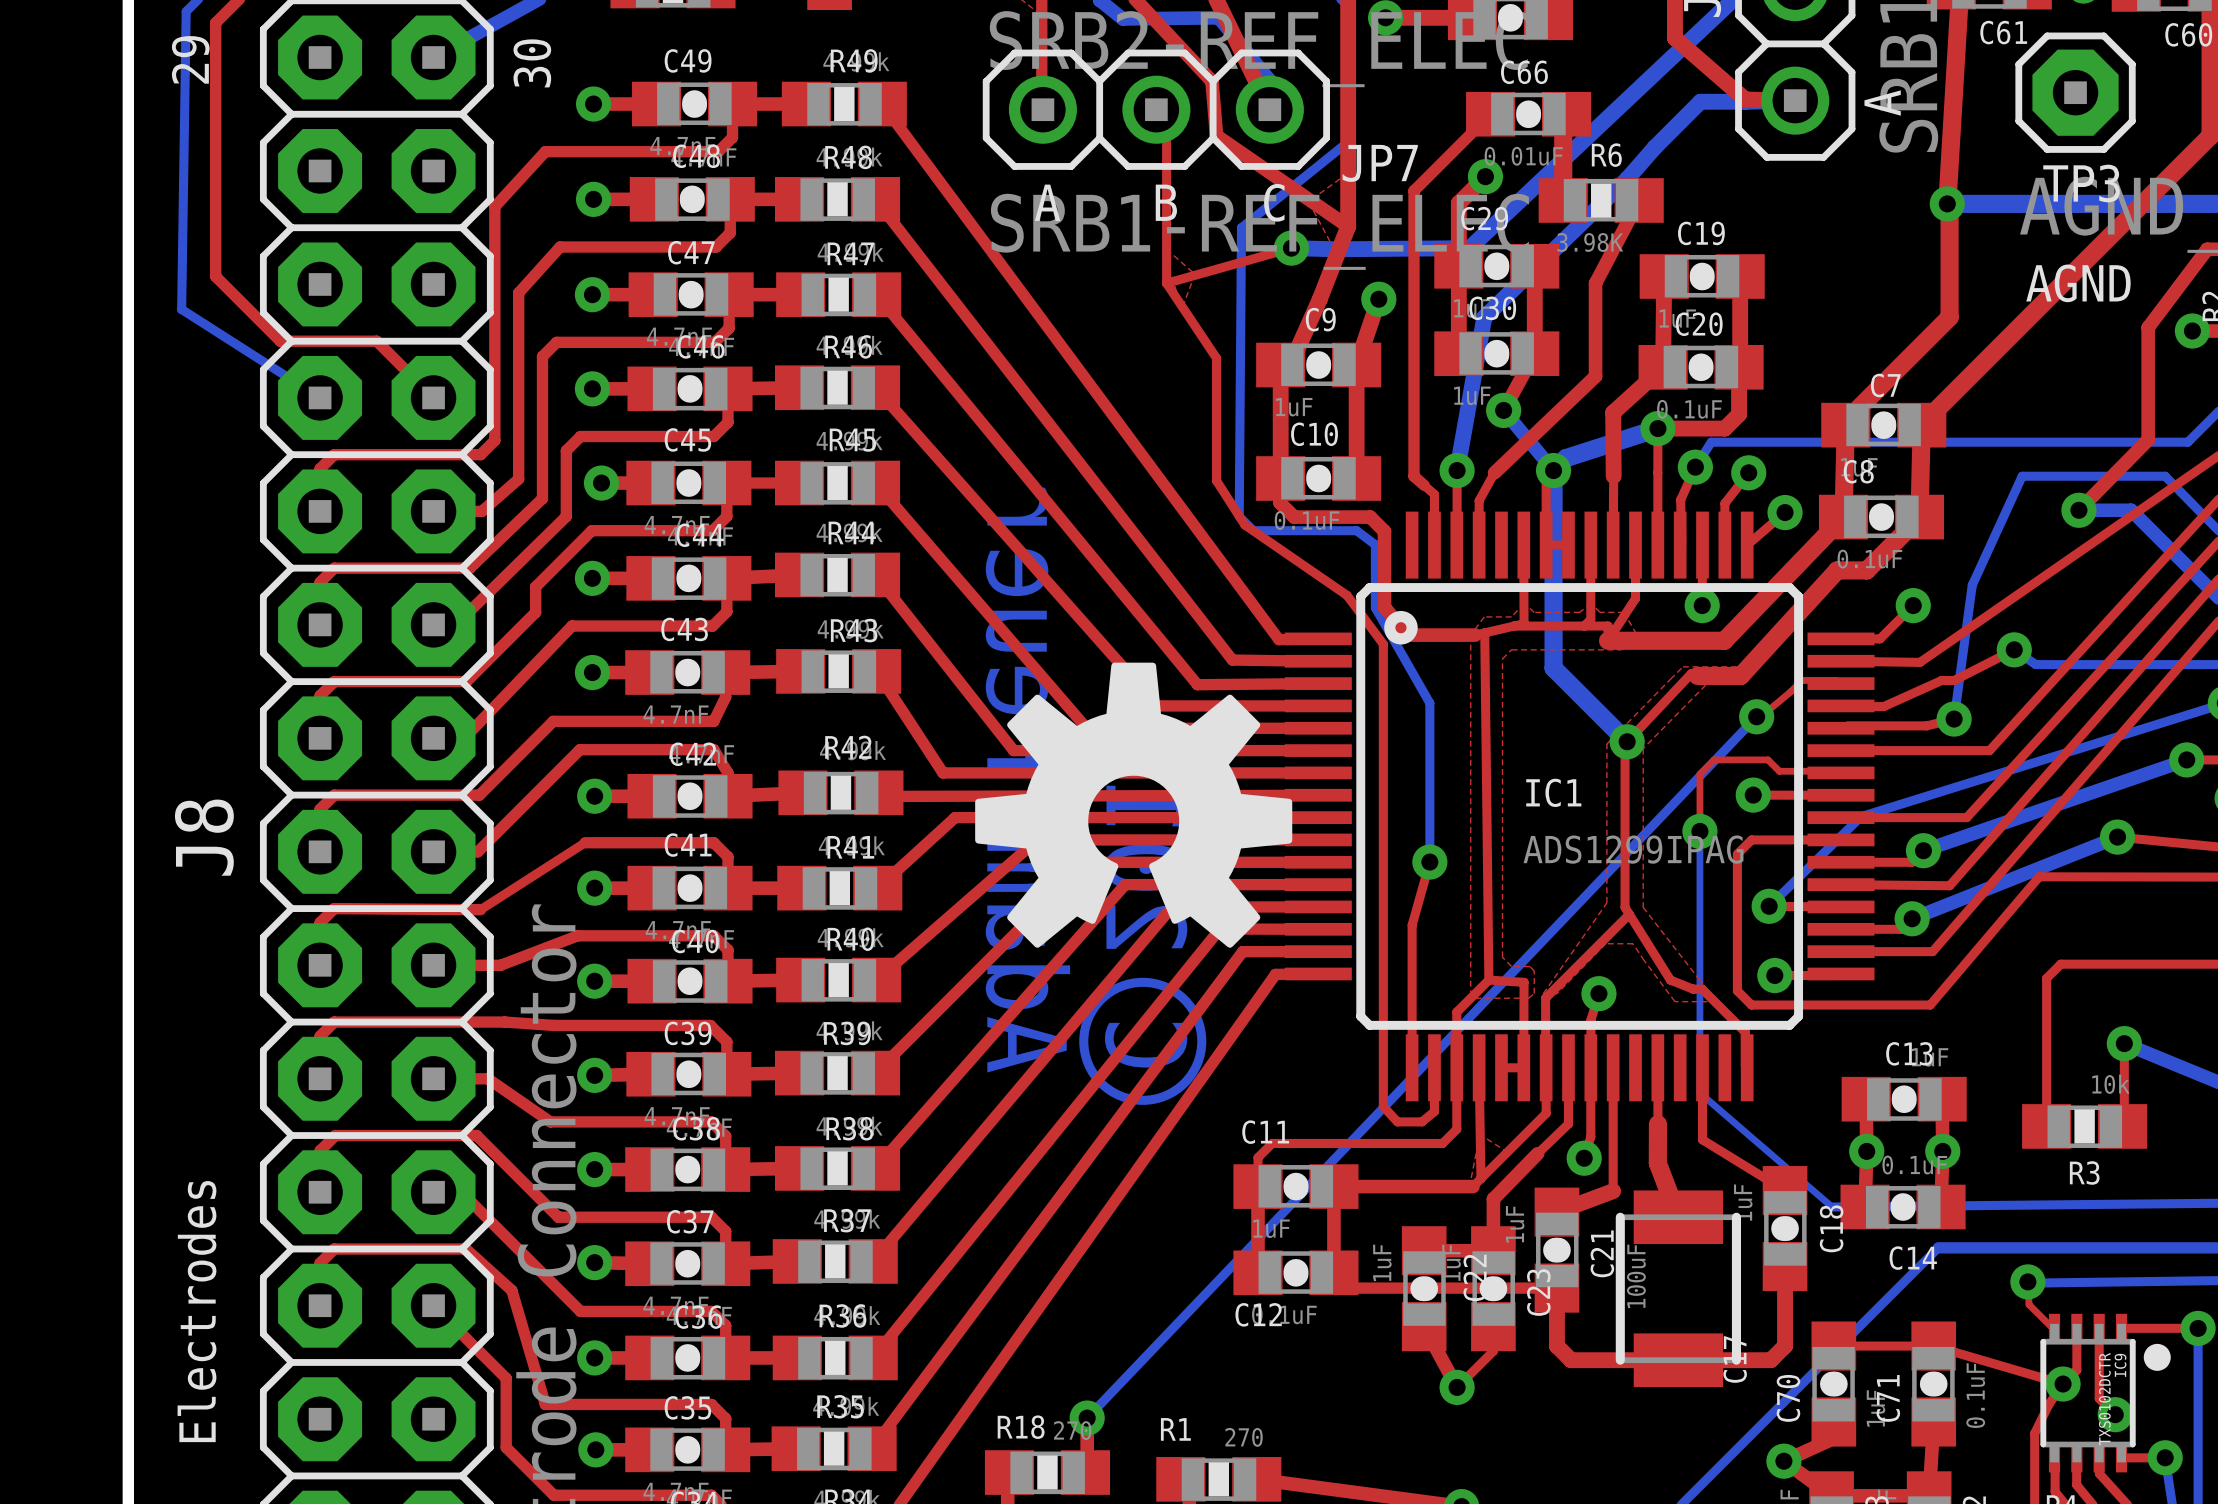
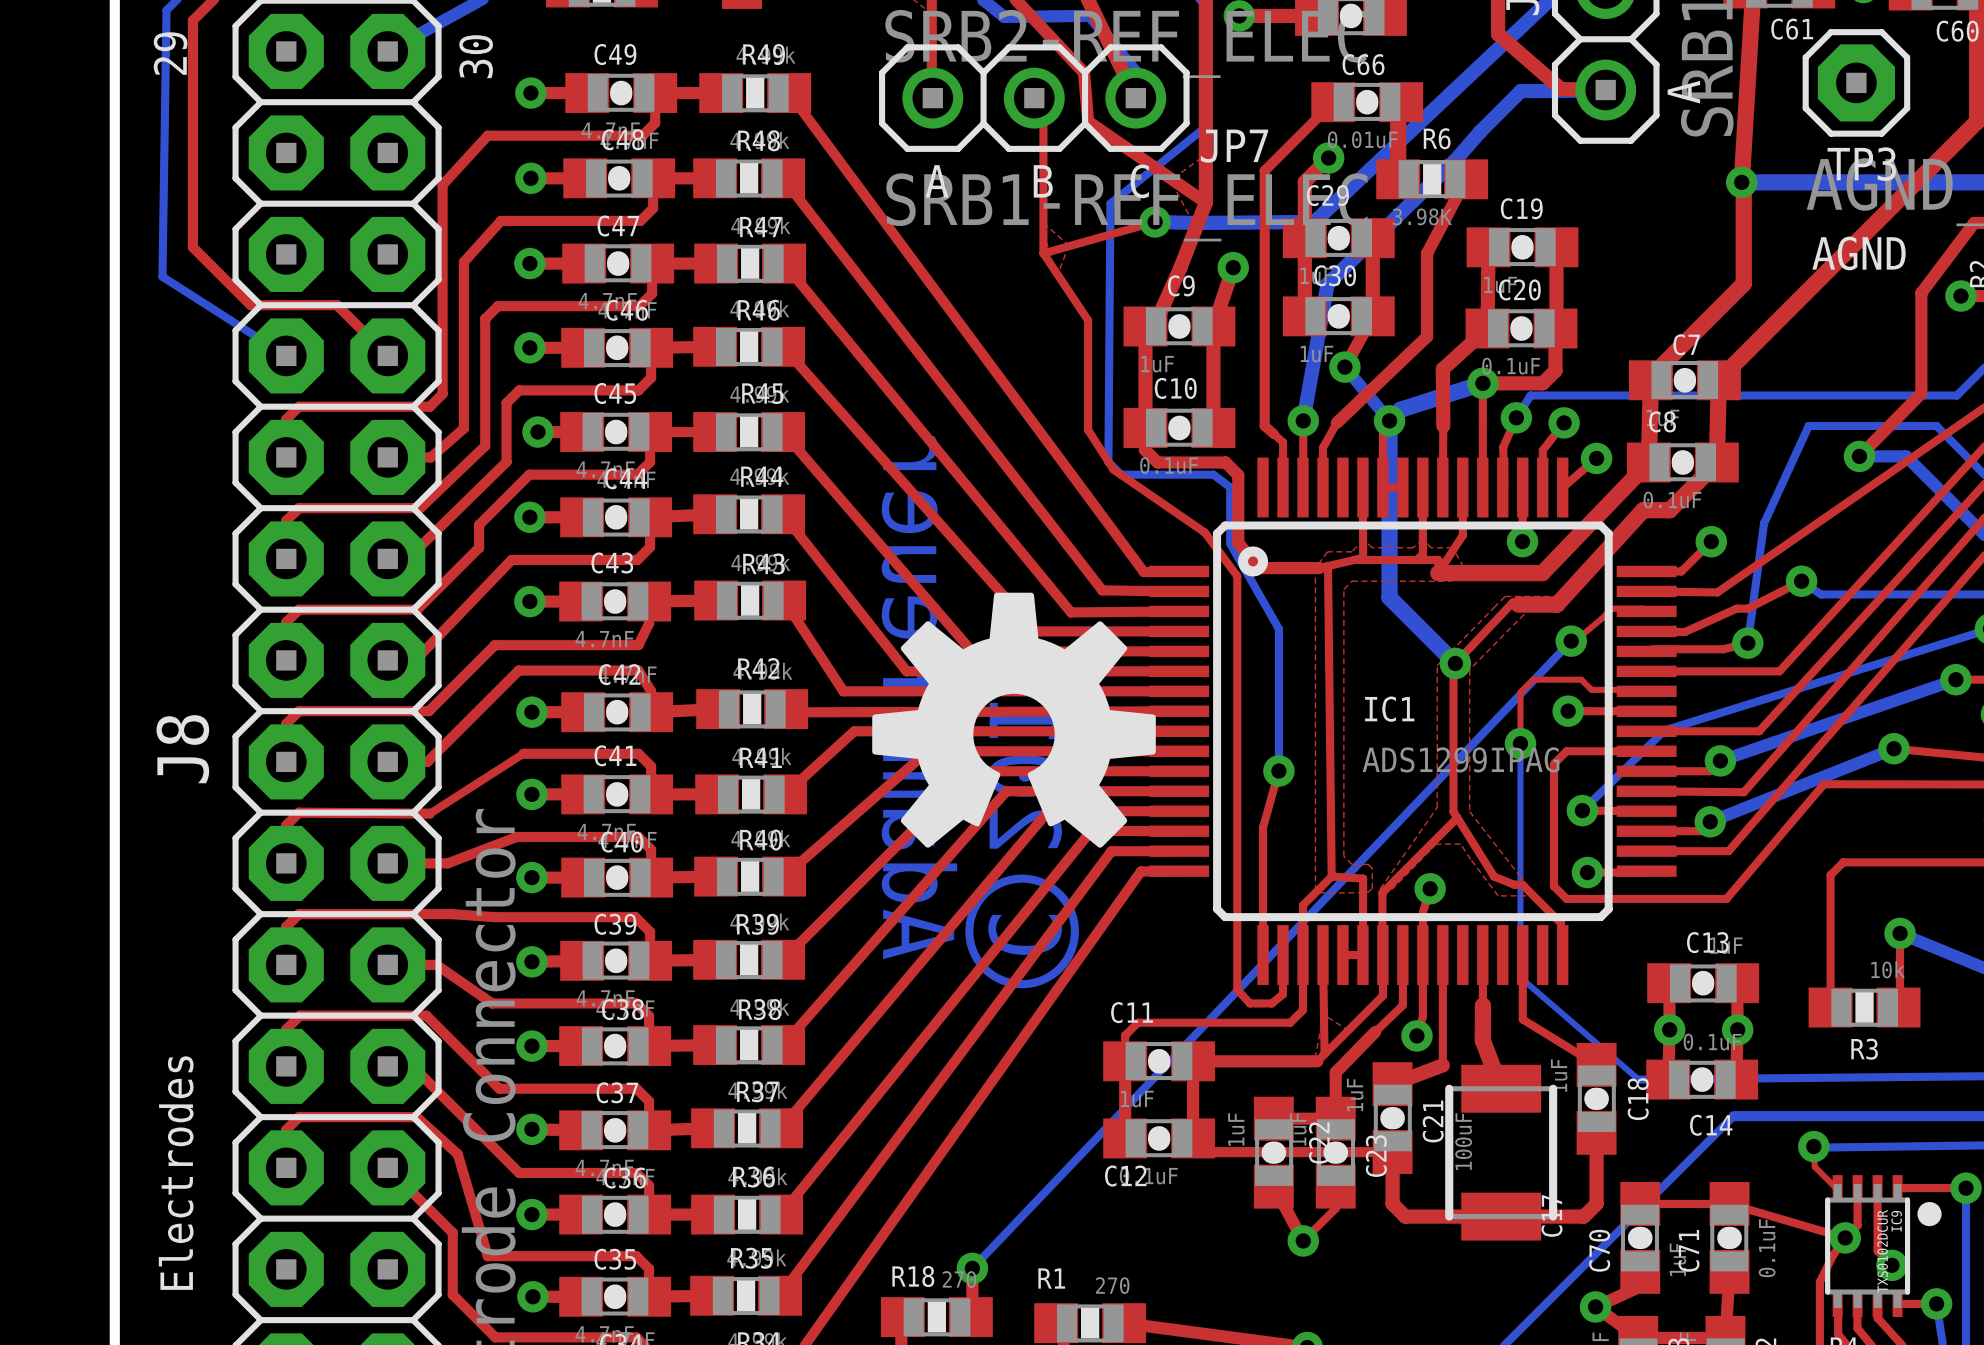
IC9 value: TXS0102DCTR (2104, 1399) -> TXS0102DCUR (1882, 1251)

